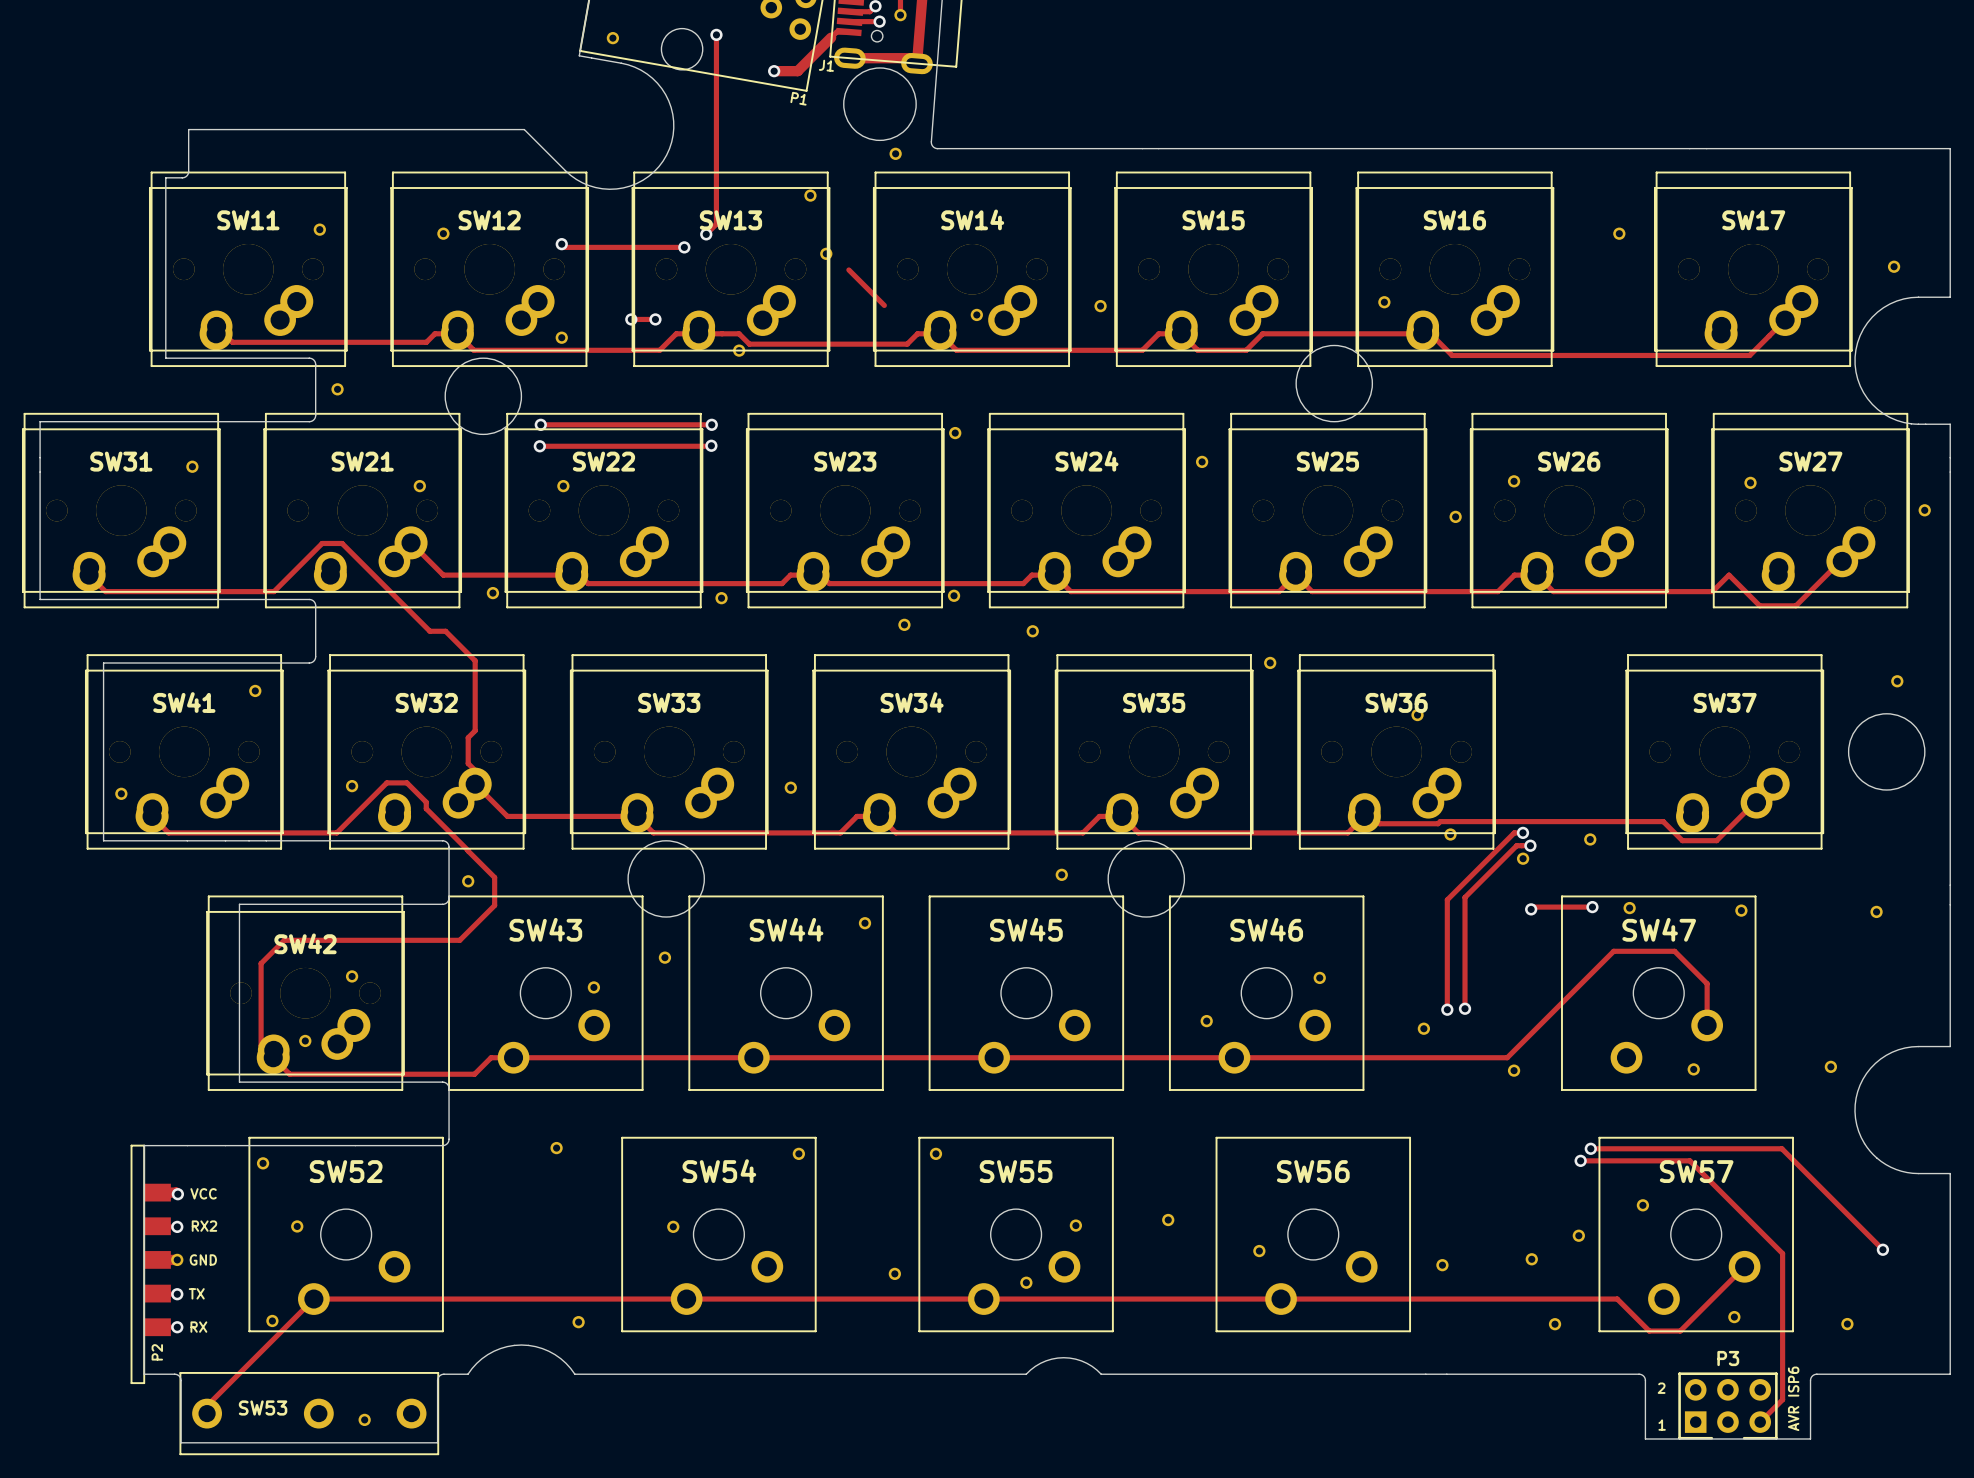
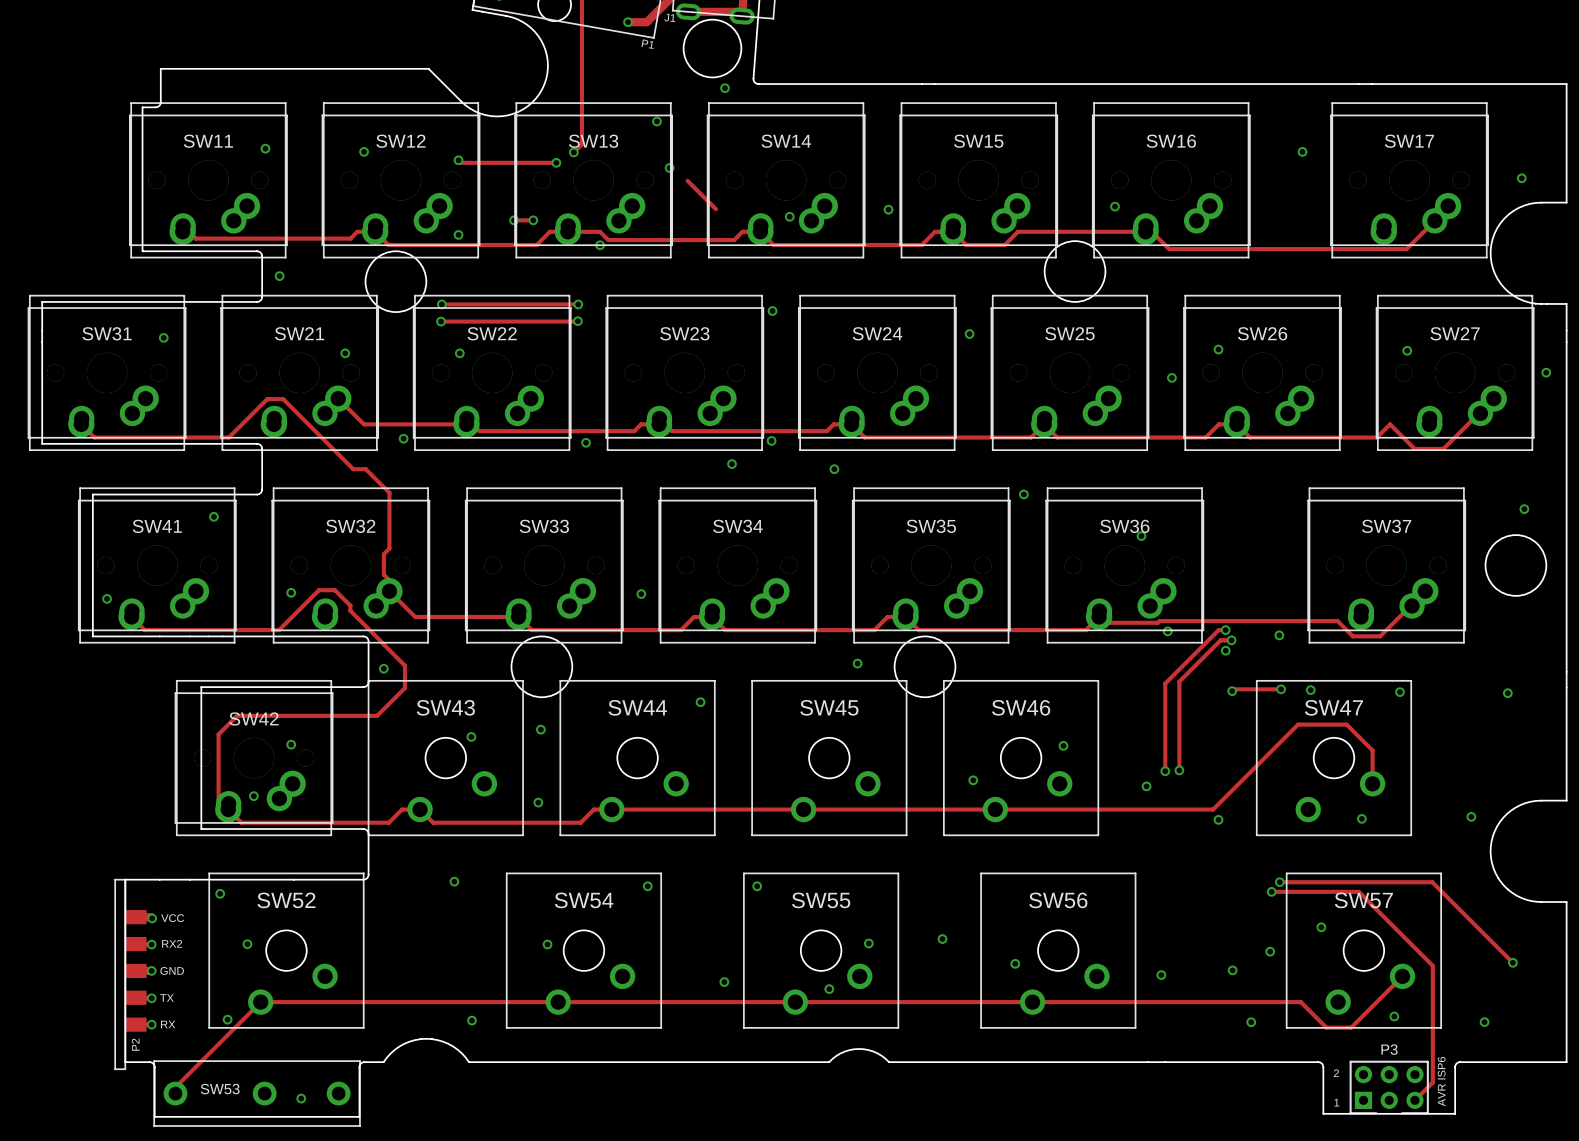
part position: (593, 987) -> (471, 736)
part: none -> (538, 802)
track: (517, 1057) (731, 1057) -> (420, 809) (433, 822) (580, 822) (593, 809)

